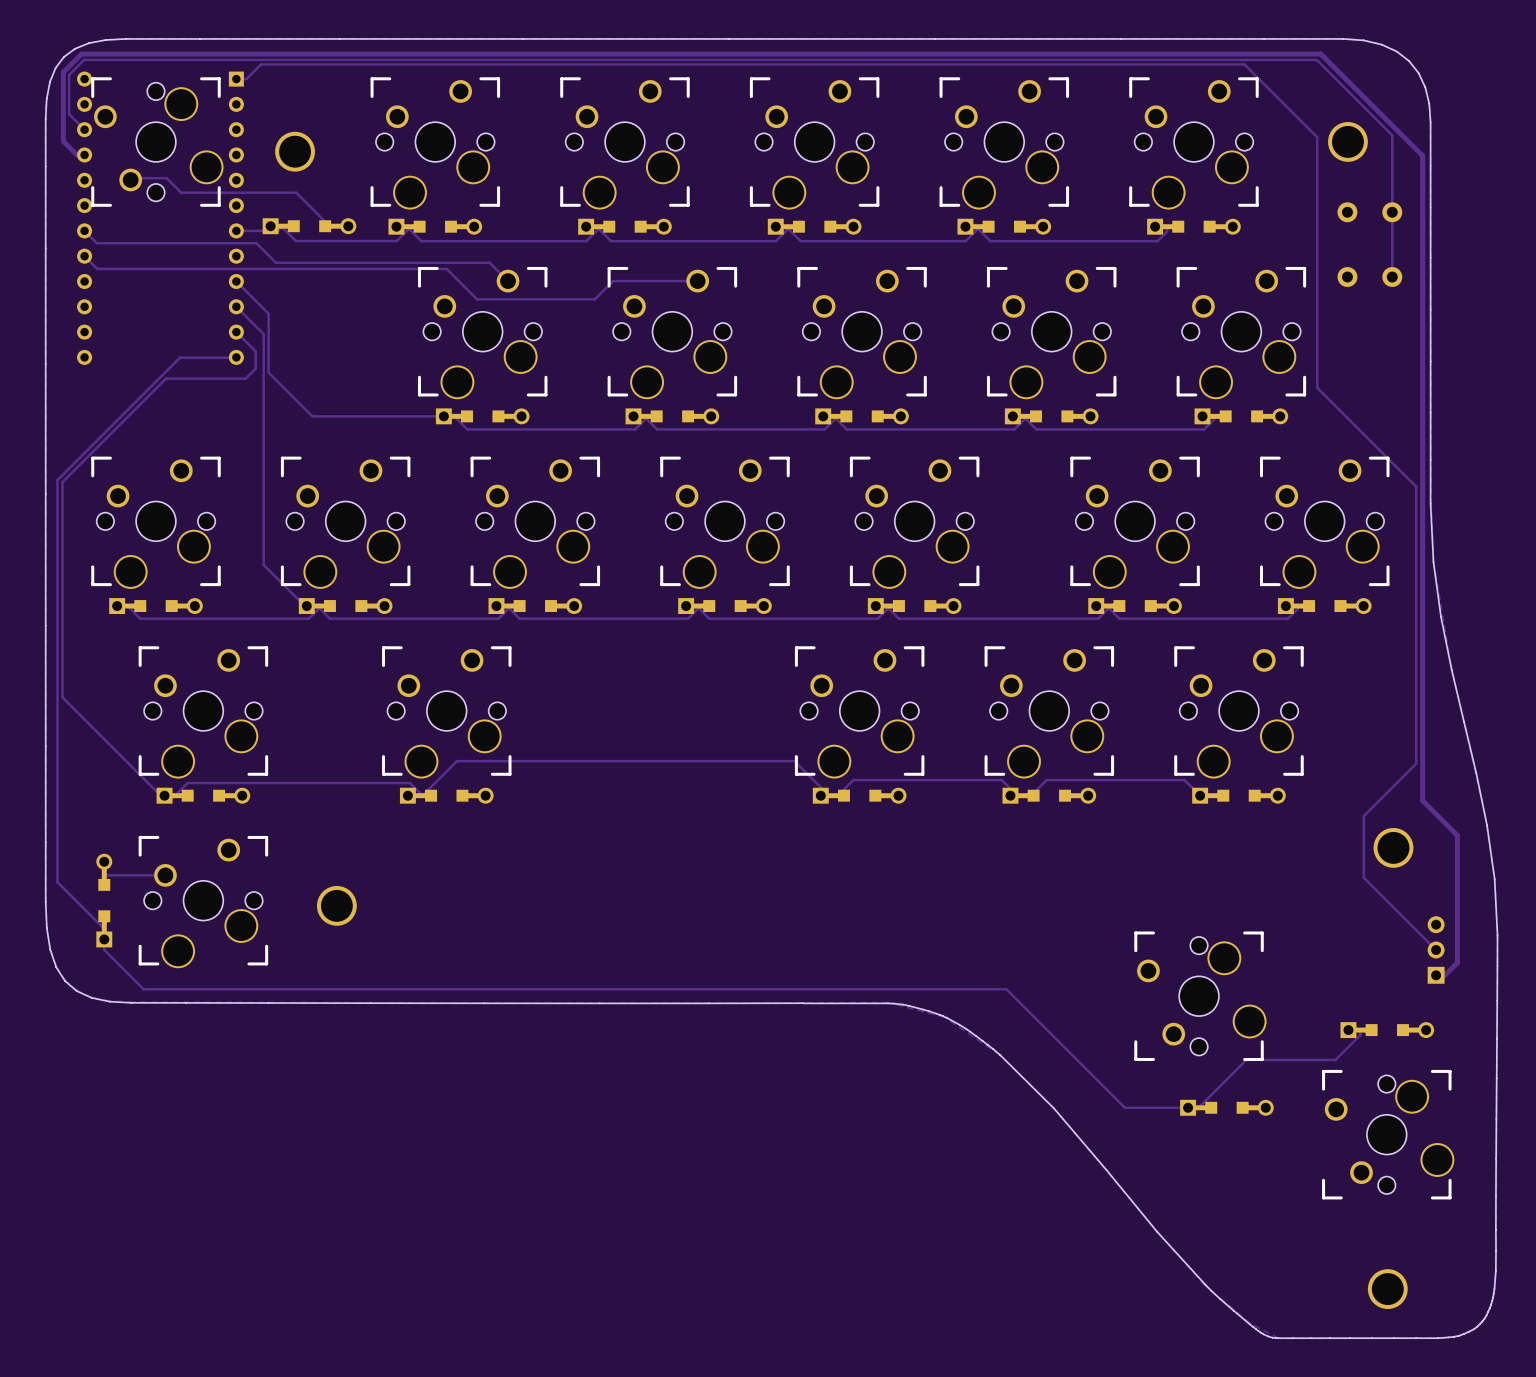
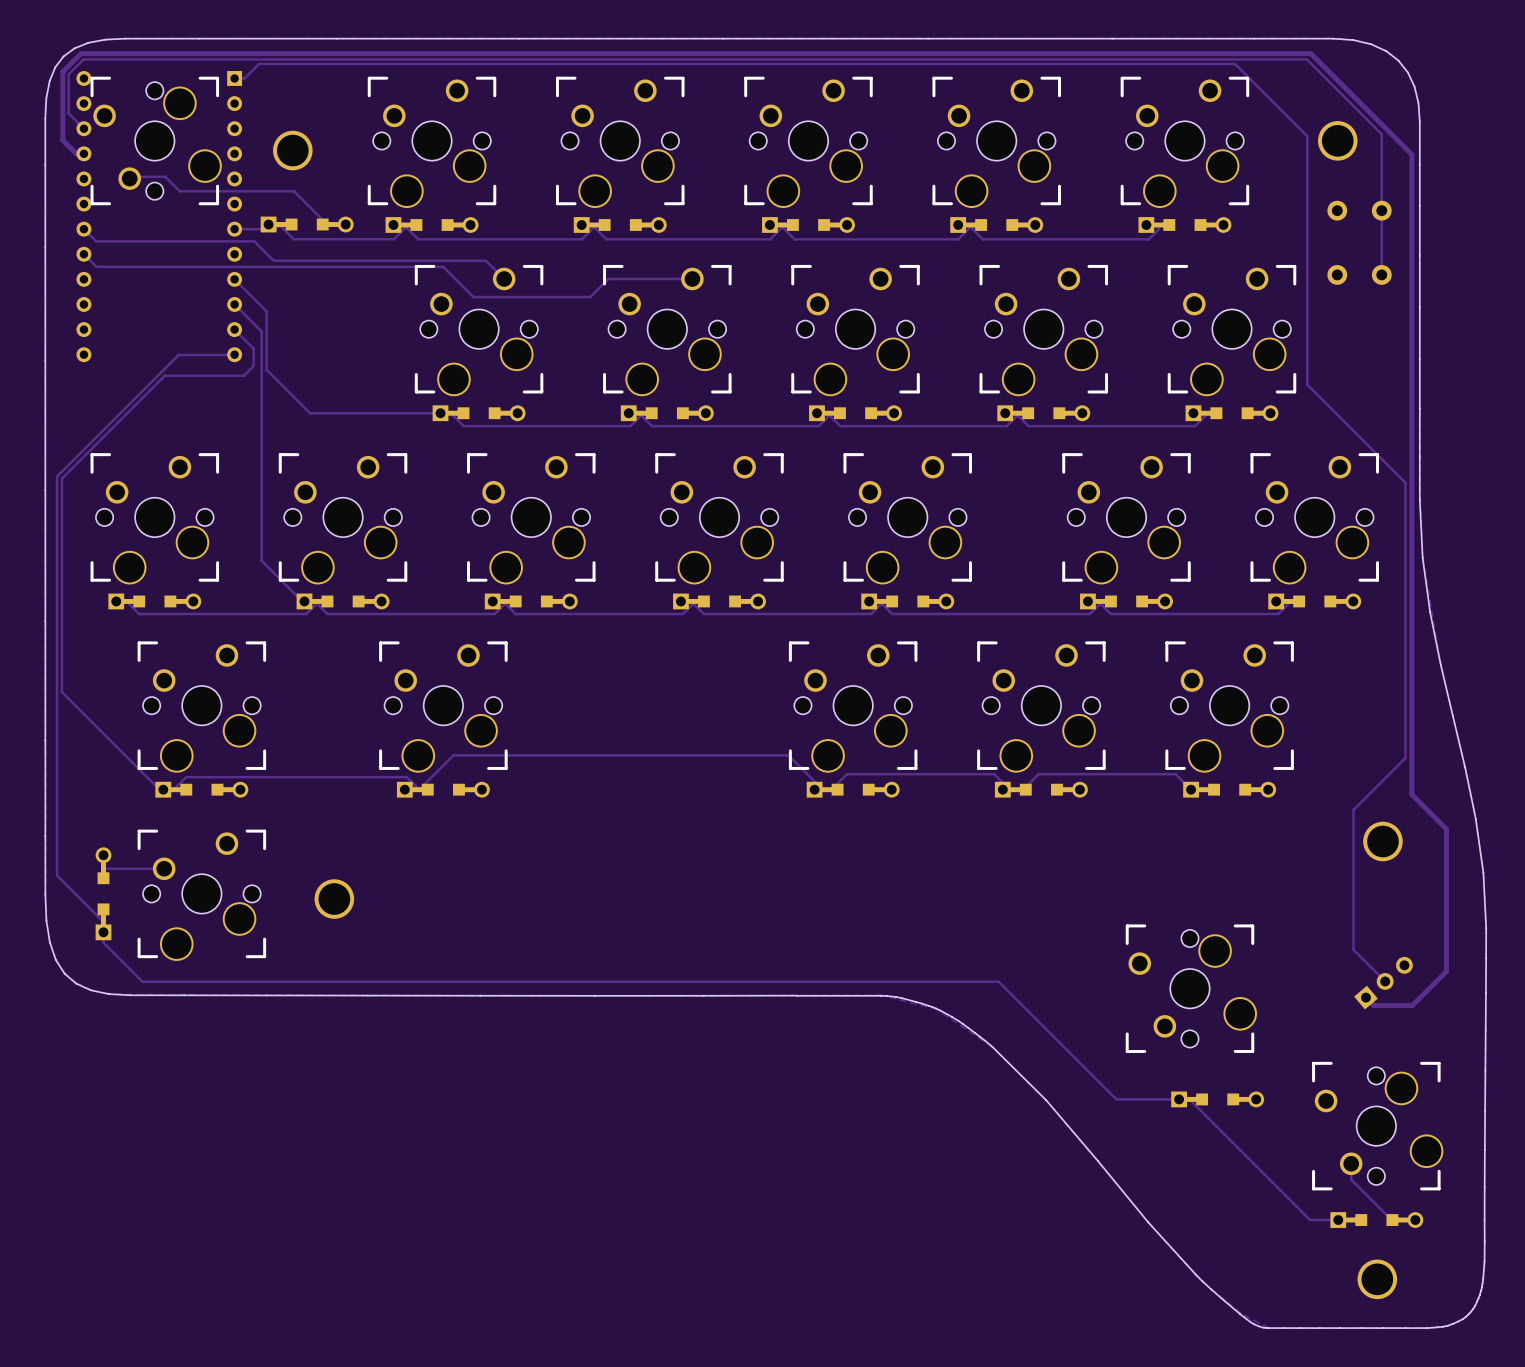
track: (1363, 877) (1436, 950) -> (1353, 871) (1353, 949) (1385, 981)
part: (1436, 950) -> none
track: (1457, 962) (1444, 975) (1436, 975) -> (1446, 955) (1446, 971) (1412, 1005) (1373, 1005) (1365, 997)
part: none -> (1383, 983)
track: (1360, 1030) (1360, 1035) (1335, 1059) (1246, 1059) (1198, 1107) -> (1361, 1220) (1310, 1220) (1189, 1099)
part position: (1387, 1030) -> (1376, 1220)
track: none -> (1351, 1163) (1351, 1179) (1391, 1220) (1403, 1220)

